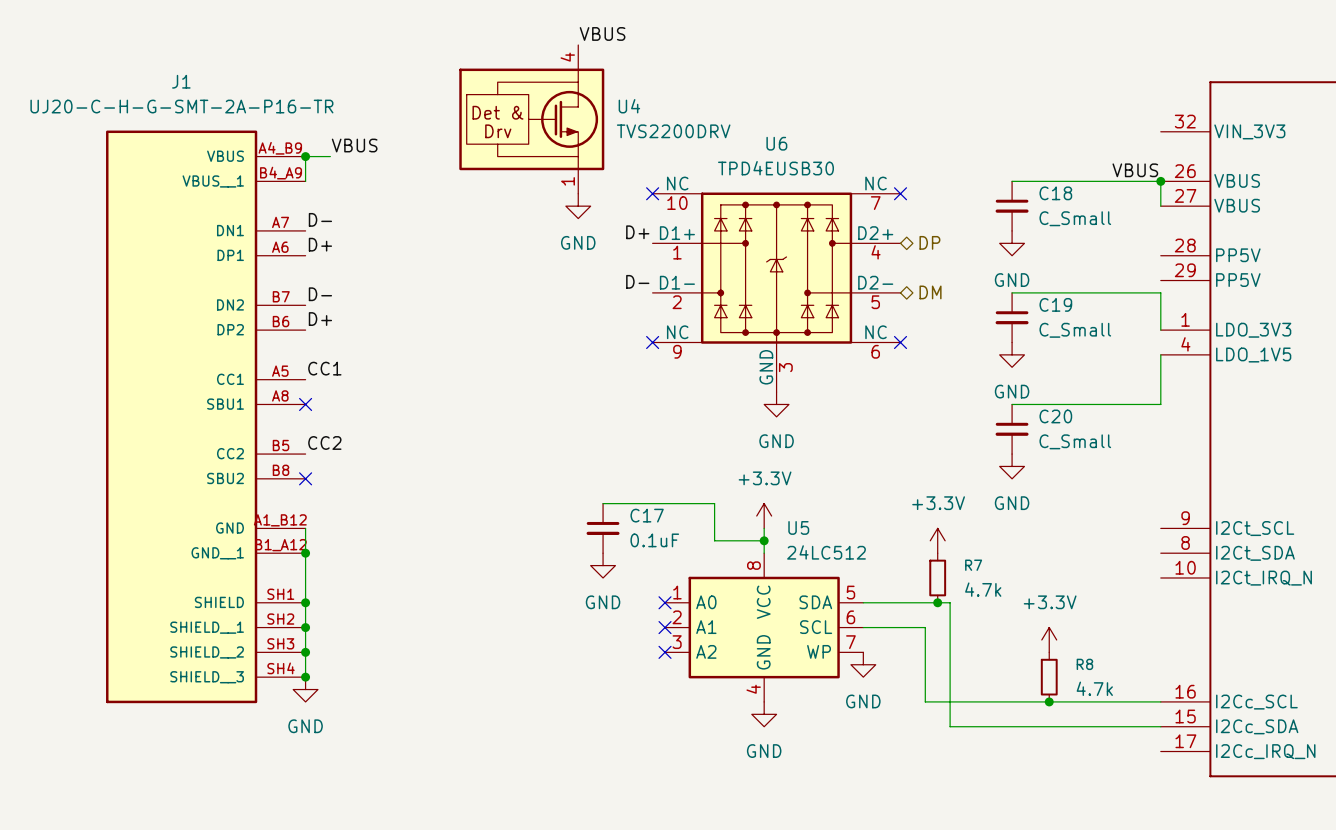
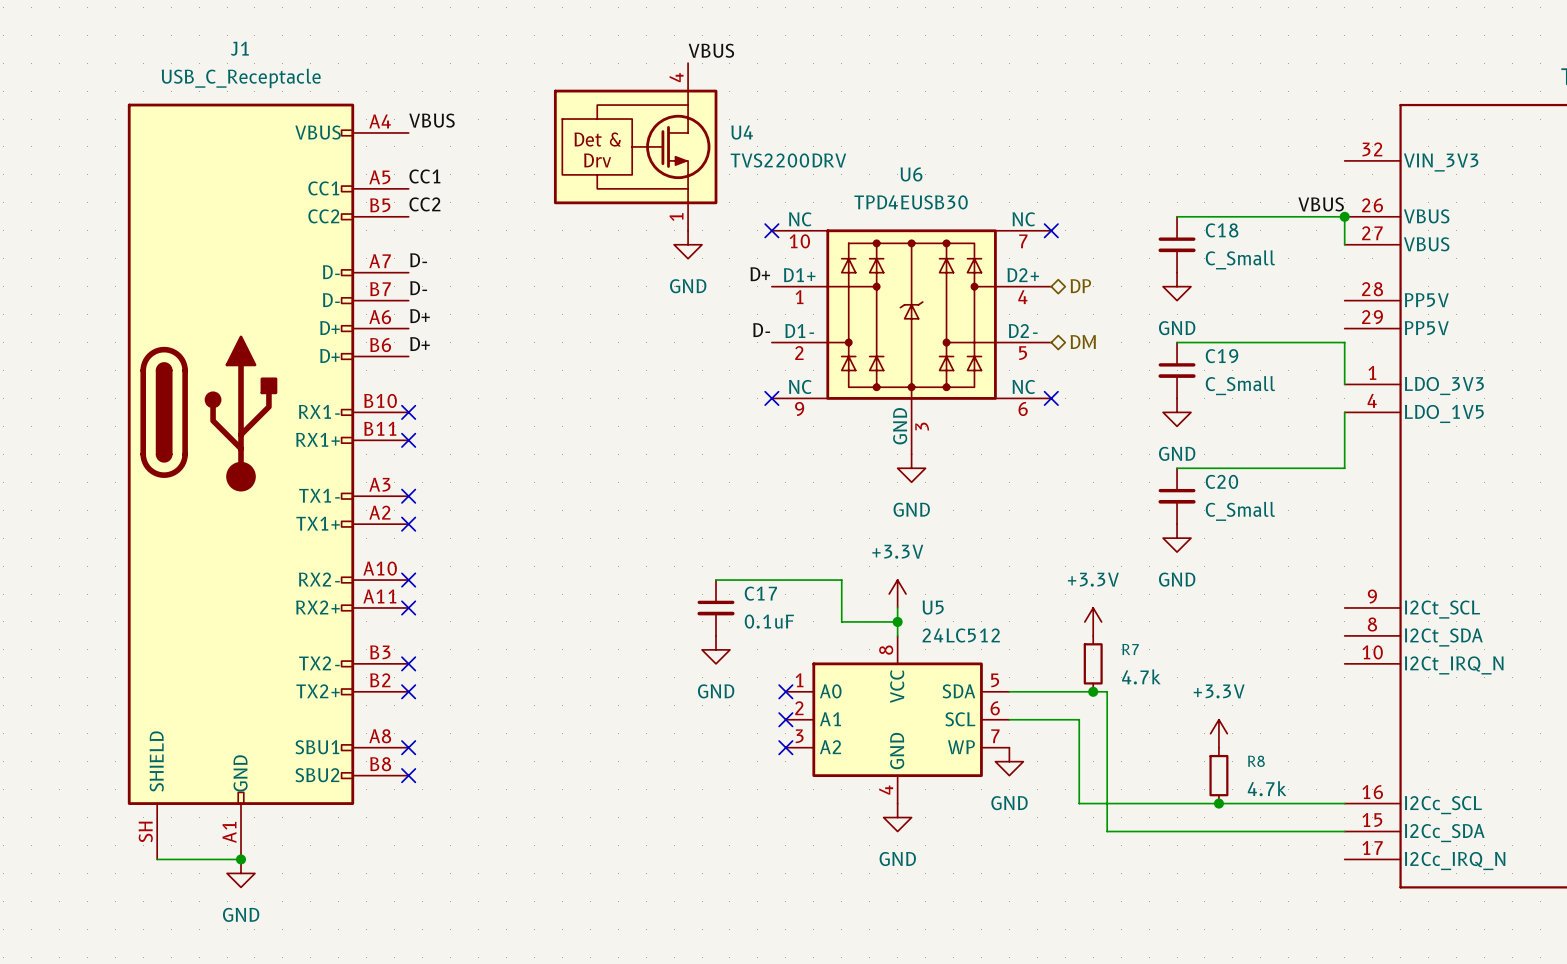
J1 name position: J1 (181, 81) -> J1 (239, 48)
label: none -> VBUS (431, 120)
J1 value: UJ20-C-H-G-SMT-2A-P16-TR (181, 106) -> USB_C_Receptacle (241, 78)
J1 symbol: [106, 130, 306, 704] -> [127, 103, 409, 860]
label: VBUS (354, 145) -> CC1 (424, 176)
junction: (305, 156) -> none
label: none -> CC2 (424, 204)
label: D- (320, 219) -> none
label: none -> D- (418, 260)
label position: D+ (320, 244) -> D+ (420, 316)
label: none -> D- (418, 288)
label: D- (320, 294) -> none
label position: D+ (320, 319) -> D+ (420, 344)
no-connect mark: none -> (408, 412)
label: CC1 (324, 368) -> none
no-connect mark: none -> (408, 440)
no-connect mark: (305, 404) -> none
no-connect mark: none -> (408, 496)
label: CC2 (324, 442) -> none
no-connect mark: none -> (408, 524)
no-connect mark: (305, 478) -> none
no-connect mark: none -> (408, 580)
wire: (305, 528) (305, 677) -> none
no-connect mark: none -> (408, 607)
junction: (305, 553) -> none
no-connect mark: none -> (408, 663)
junction: (305, 602) -> none
no-connect mark: none -> (408, 691)
junction: (305, 627) -> none
junction: (305, 652) -> none
no-connect mark: none -> (408, 747)
junction: (305, 677) -> none
no-connect mark: none -> (408, 775)
power symbol position: GND (305, 689) -> GND (241, 873)
wire: none -> (157, 859) (241, 859)
junction: none -> (241, 859)

